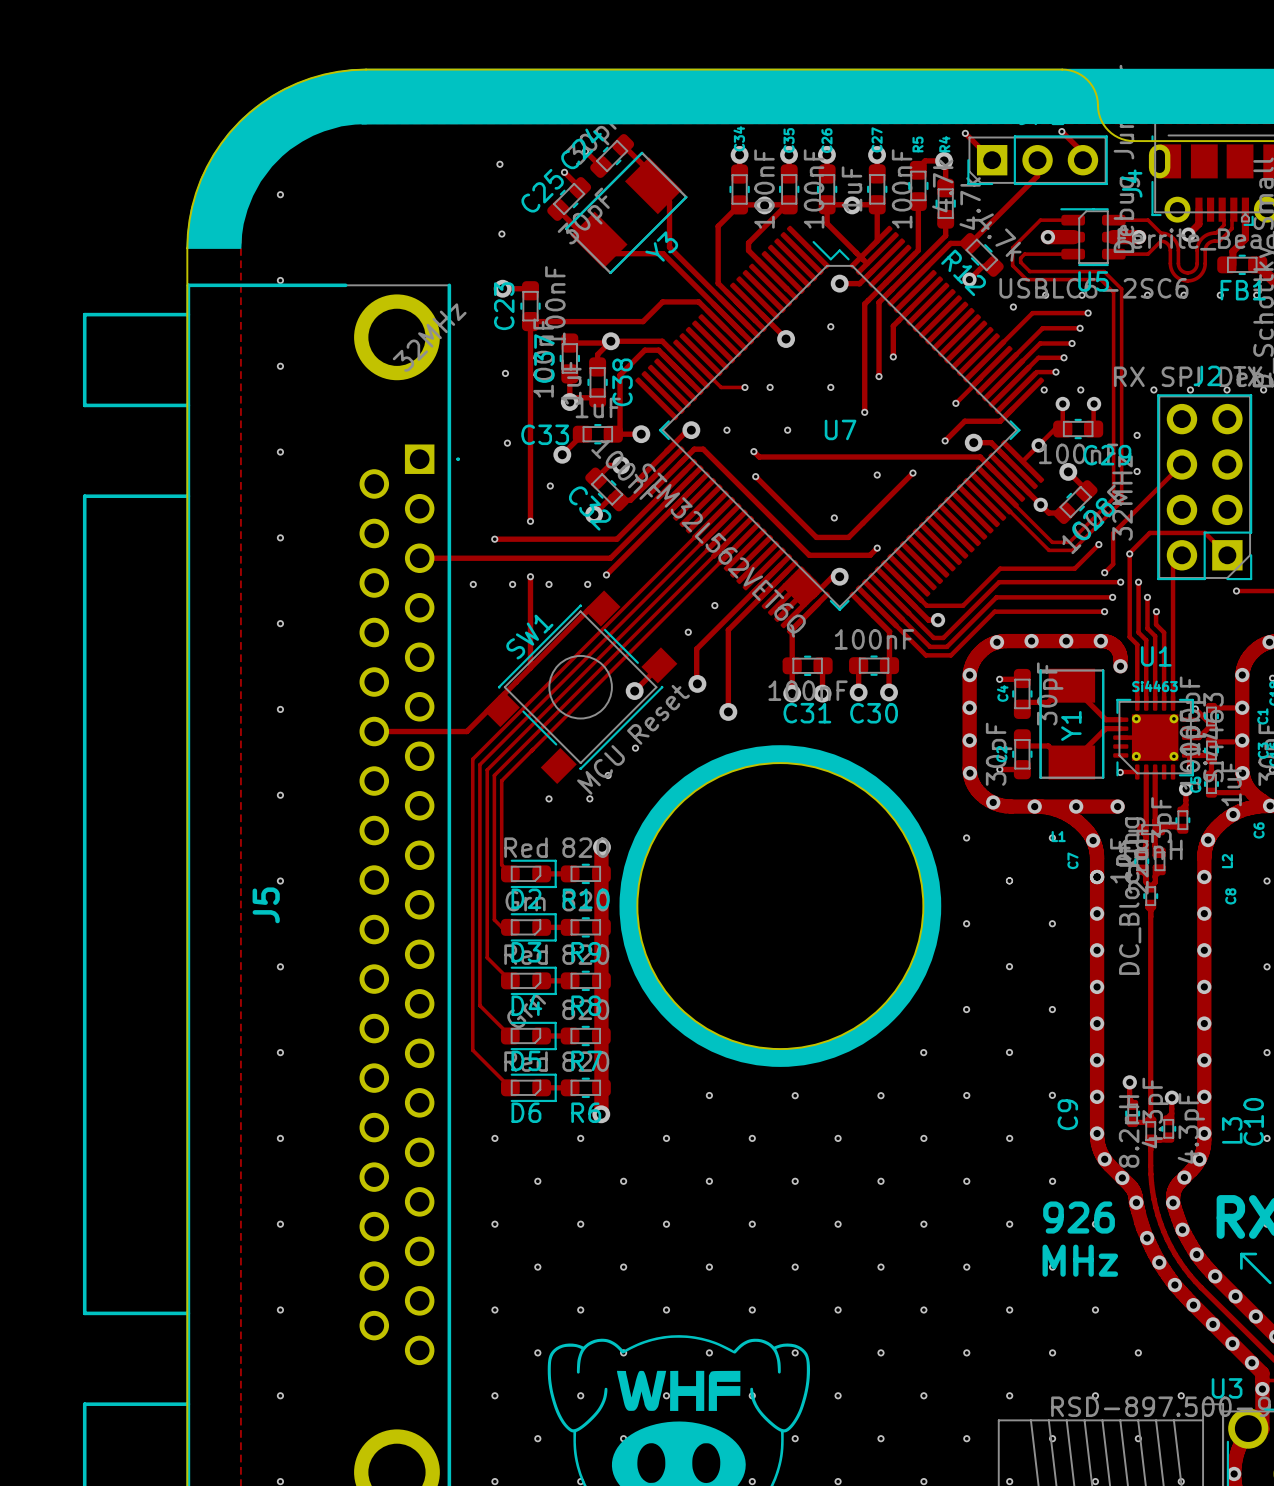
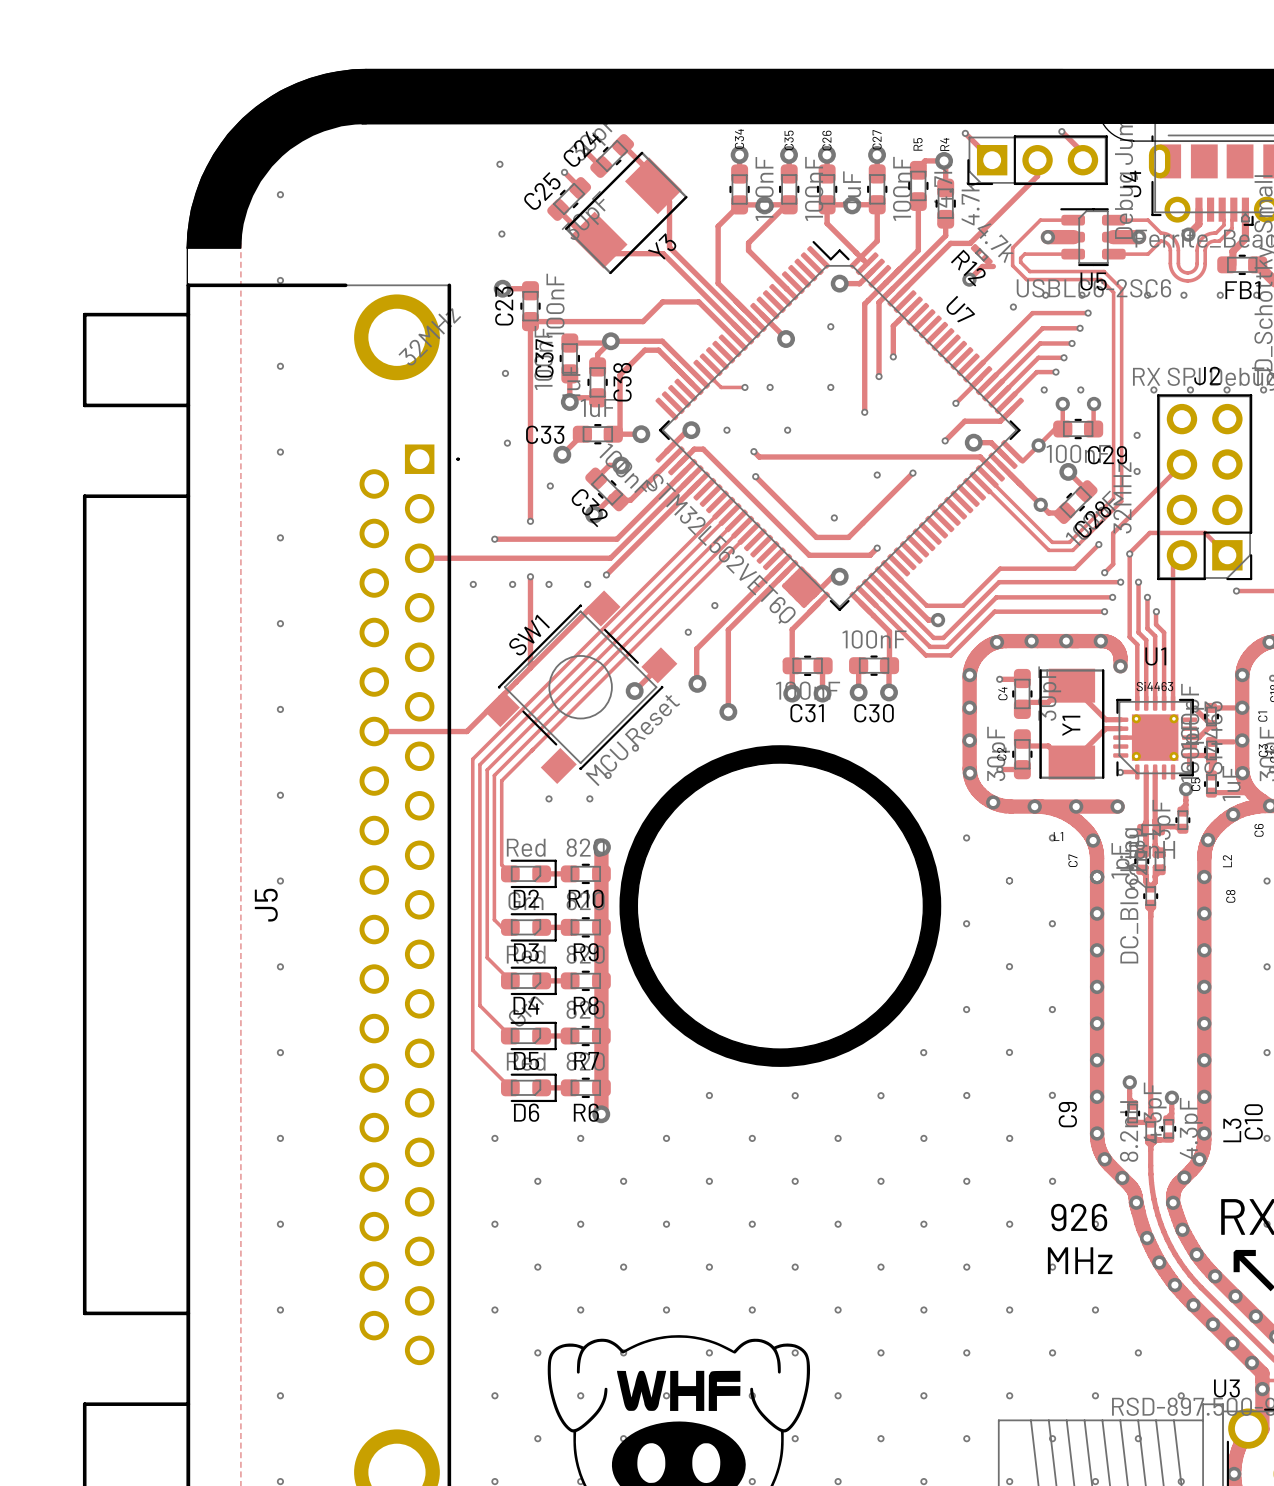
U7 footprint: [635, 225, 1045, 635] -> [655, 240, 1024, 615]
R12 footprint: [959, 232, 1004, 277] -> [970, 243, 993, 266]
U7 name position: U7 (840, 429) -> U7 (960, 309)

